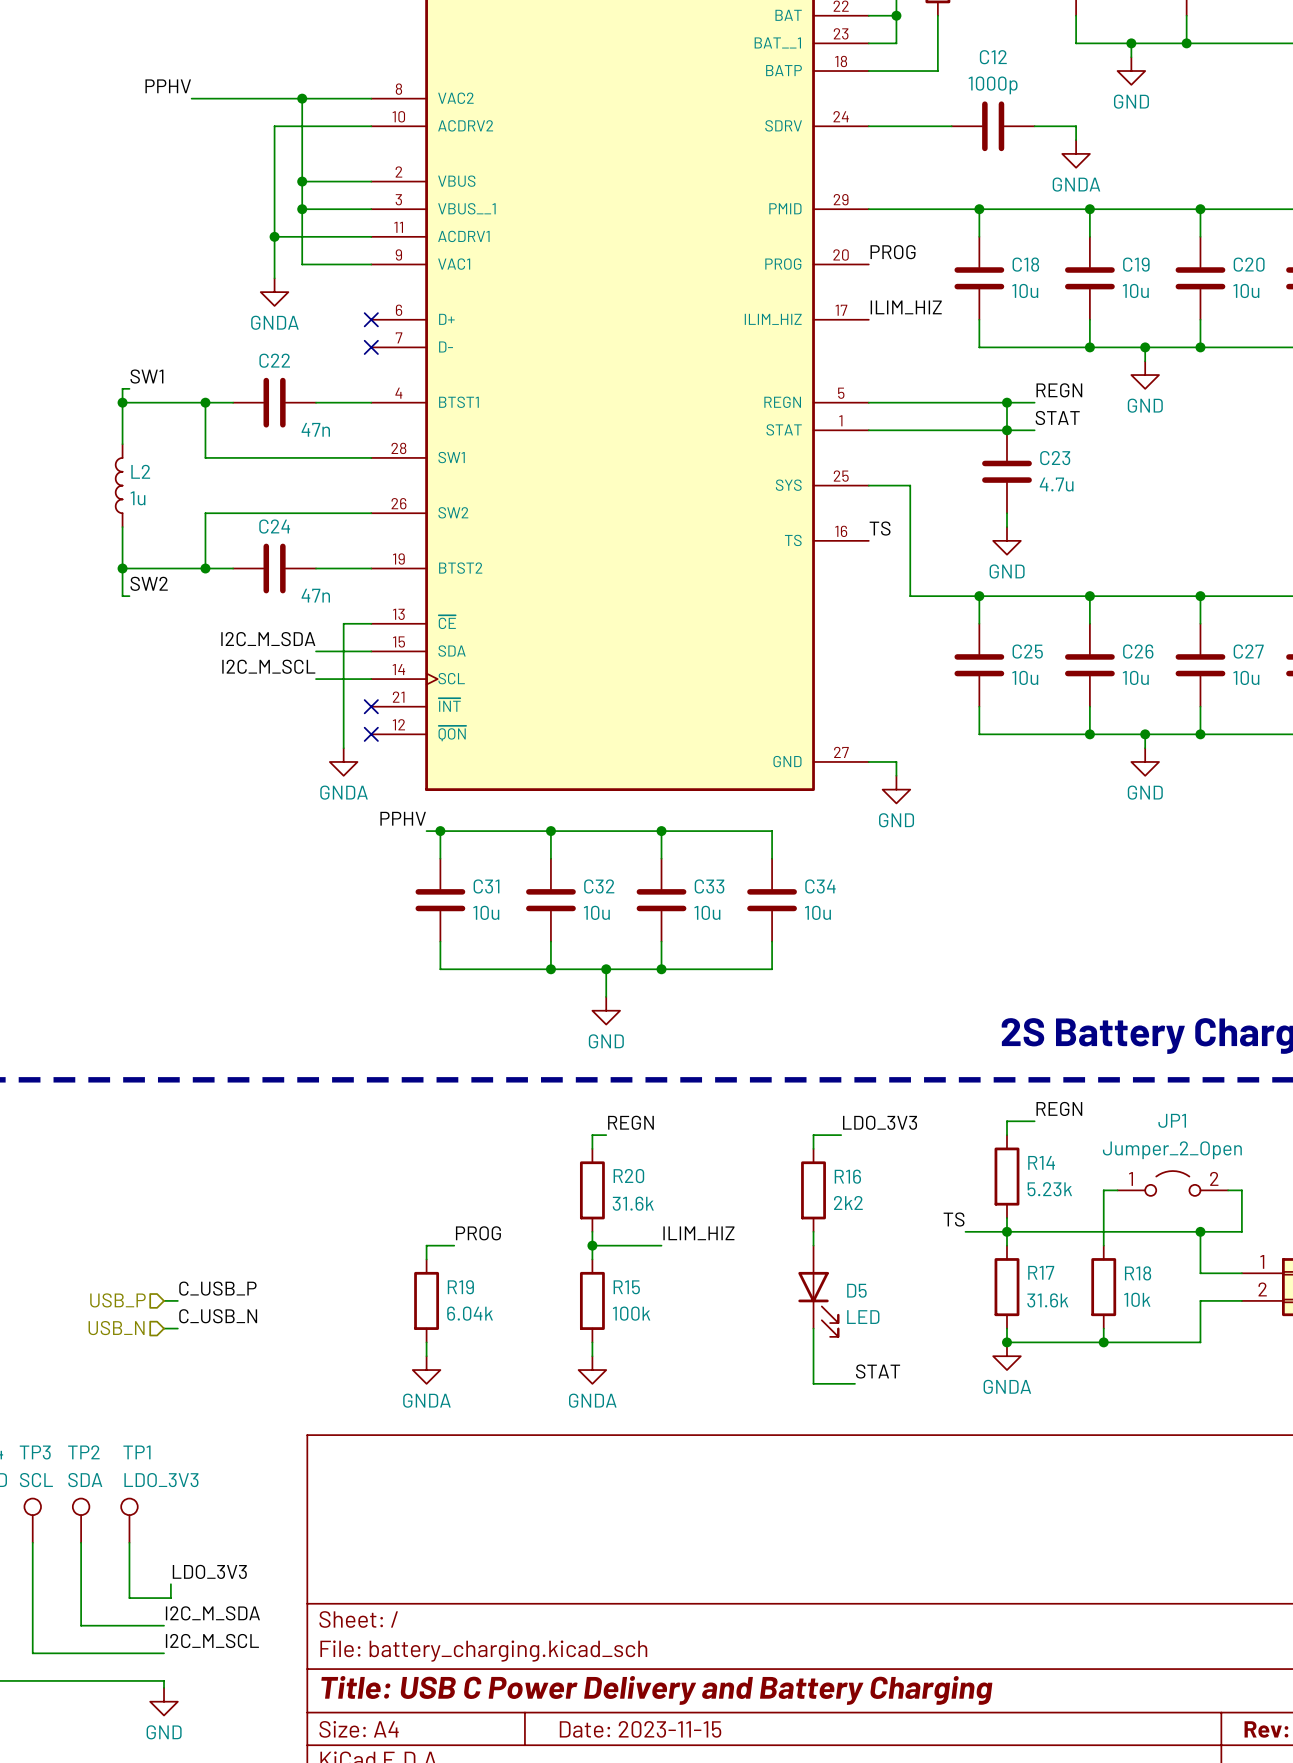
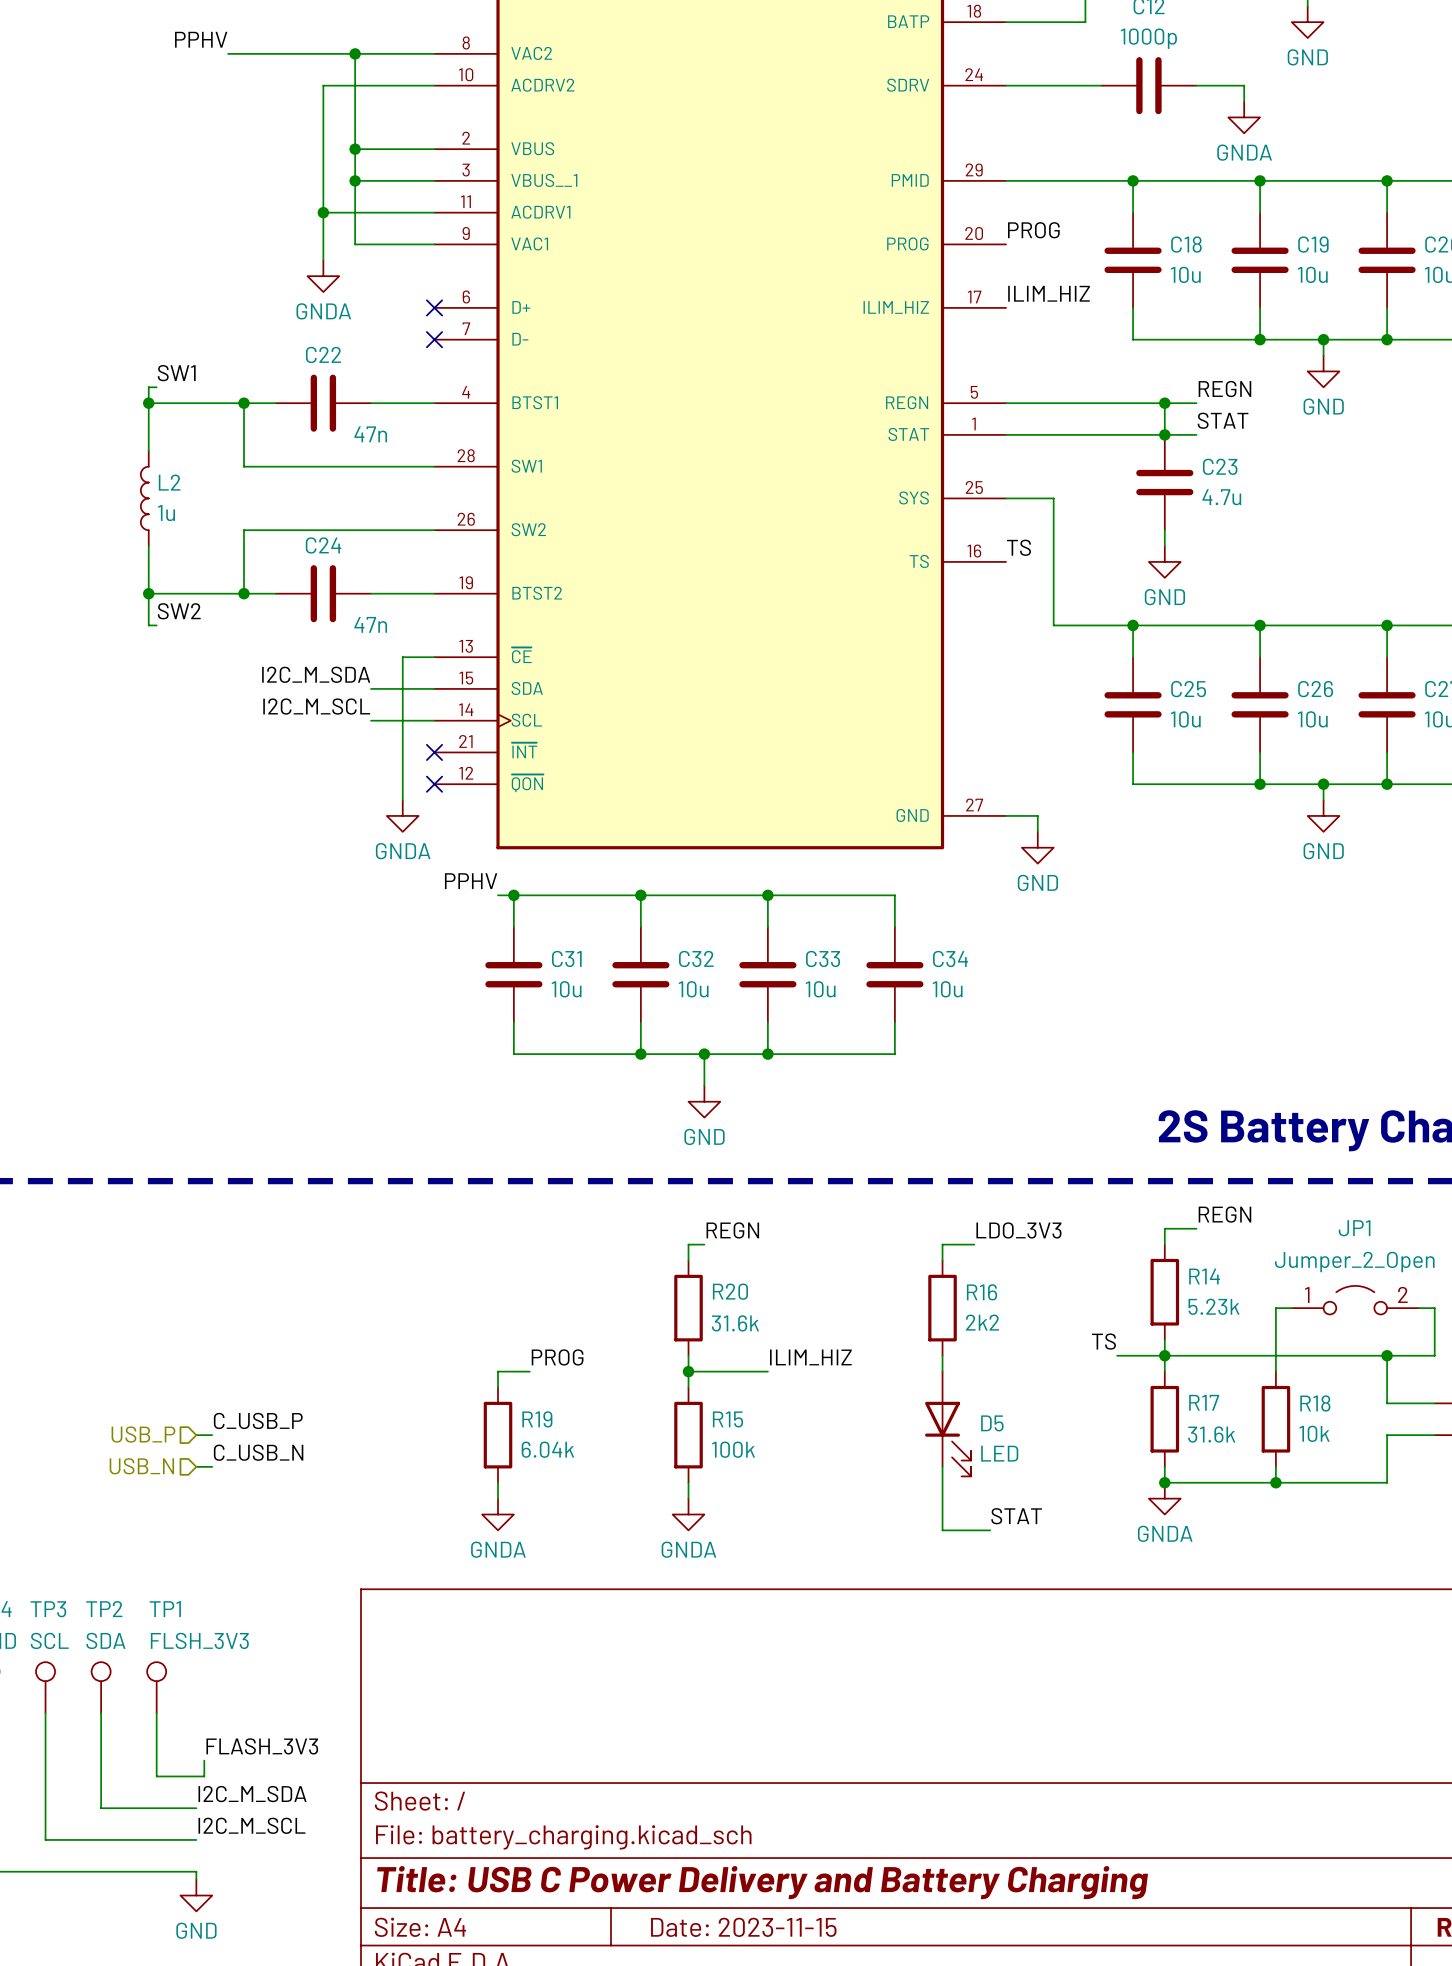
TP1 value: LDO_3V3 (161, 1480) -> FLSH_3V3 (199, 1640)
label: LDO_3V3 (209, 1571) -> FLASH_3V3 (262, 1746)

